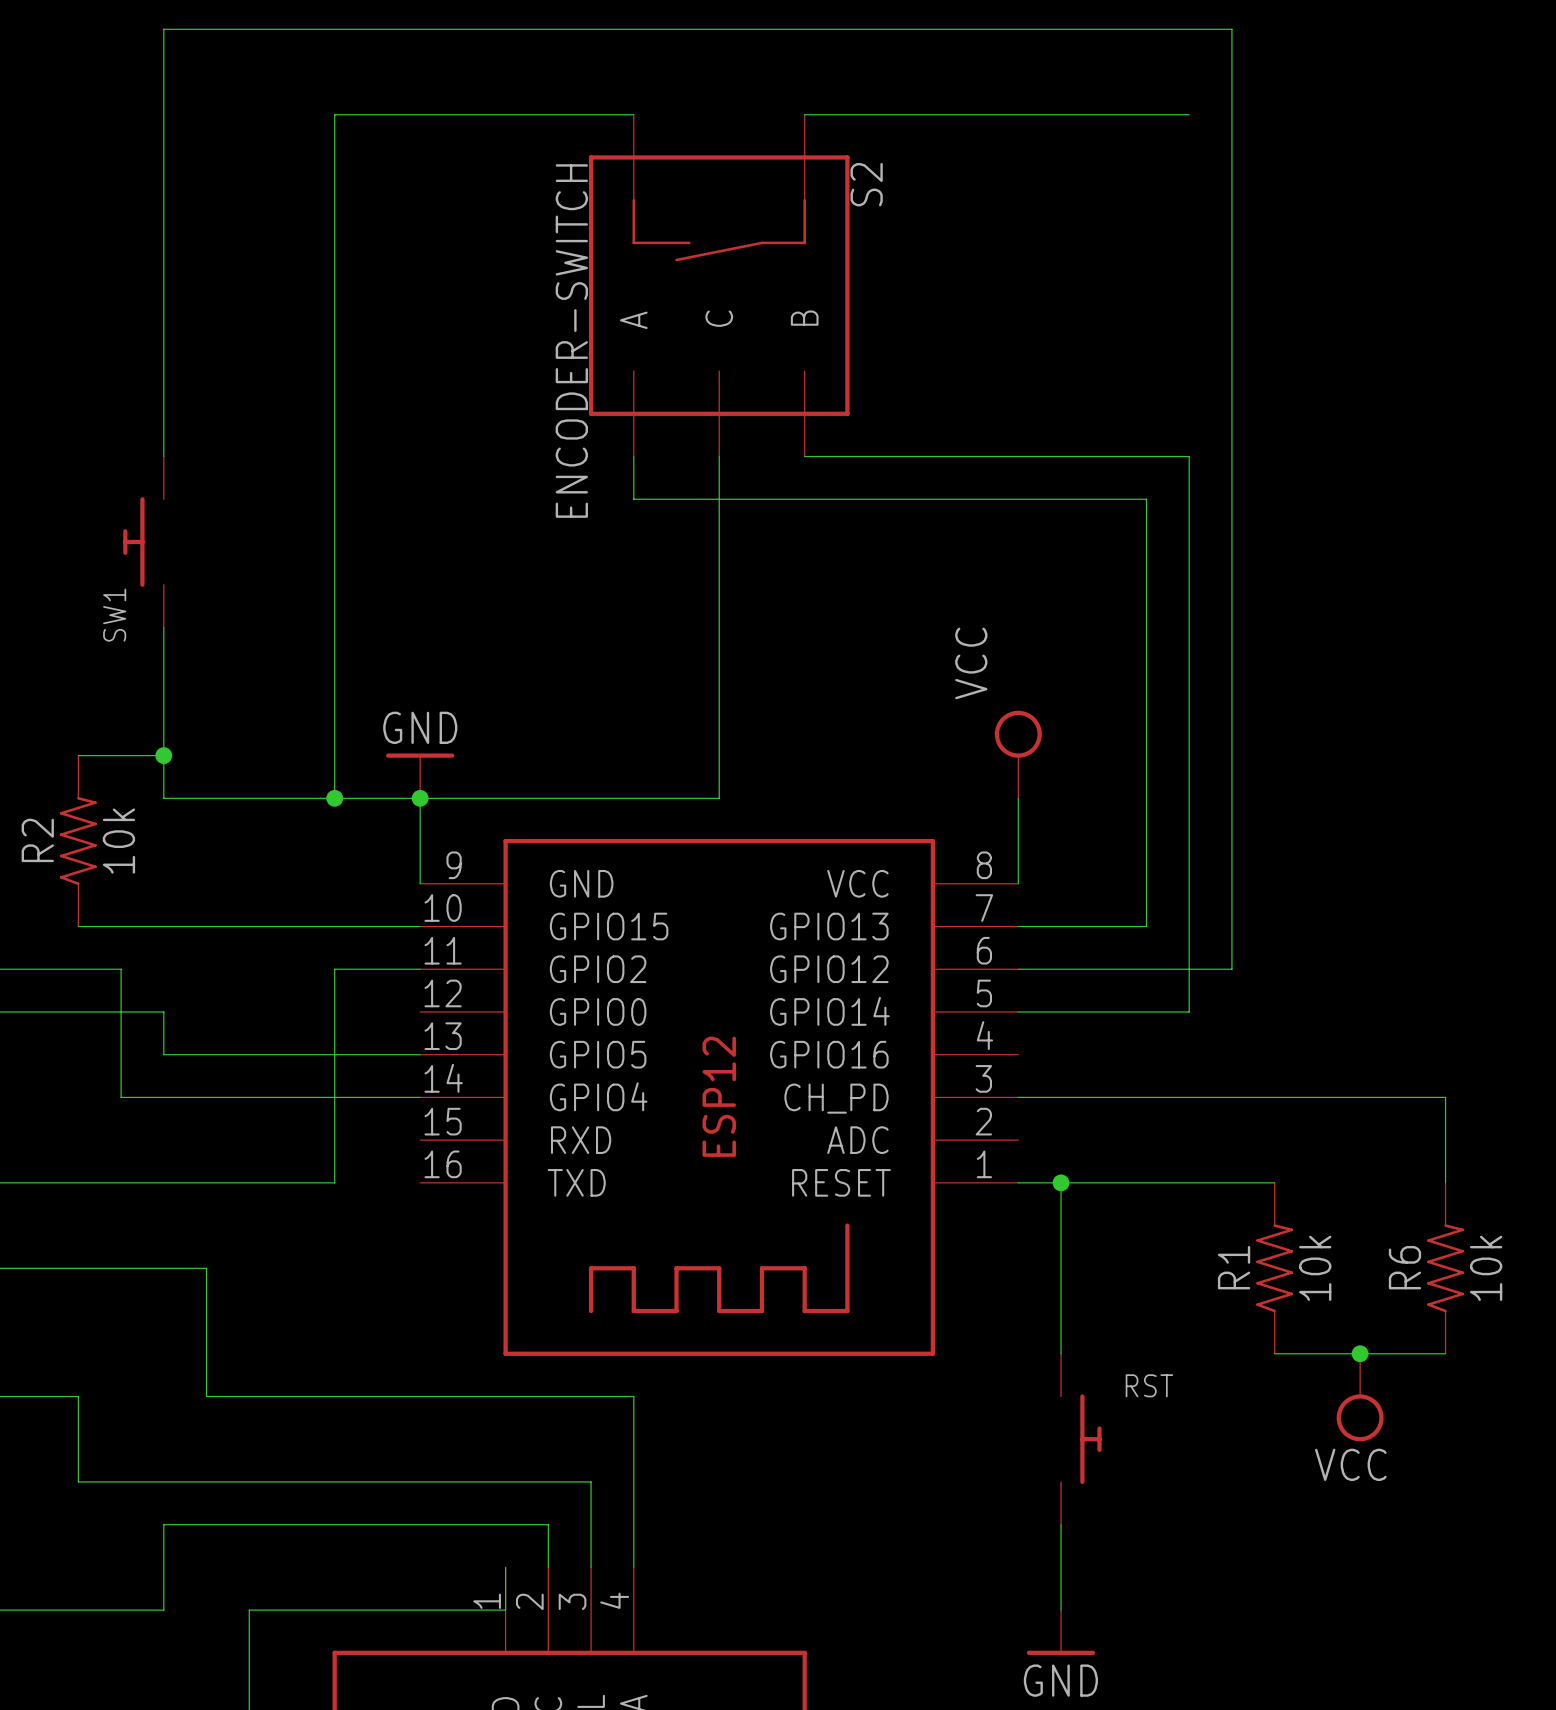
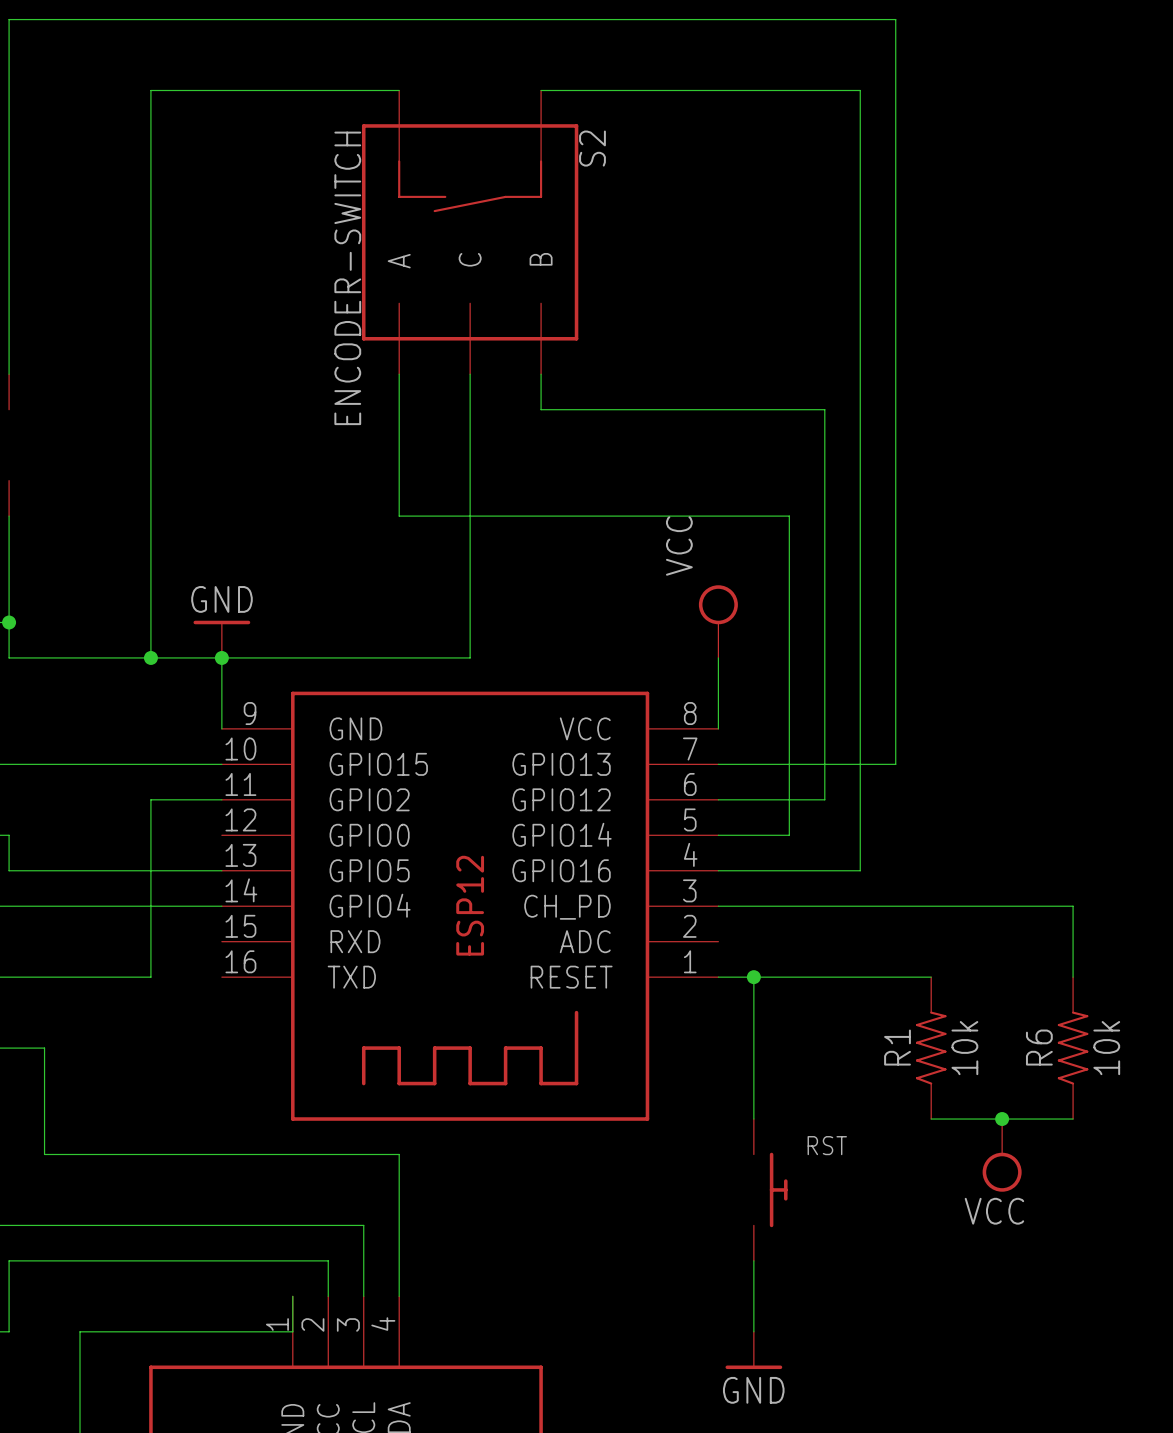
wire: (804, 456) (1189, 456) -> (860, 90) (860, 374)
wire: (633, 499) (804, 499) -> (541, 374) (541, 409)
wire: none -> (399, 409) (399, 516) (789, 516) (789, 835)
wire: (1231, 926) (1231, 969) (1146, 969) -> (895, 764) (824, 764) (824, 799)
wire: (1103, 1011) (1189, 1011) -> (718, 870) (860, 870) (860, 835)

